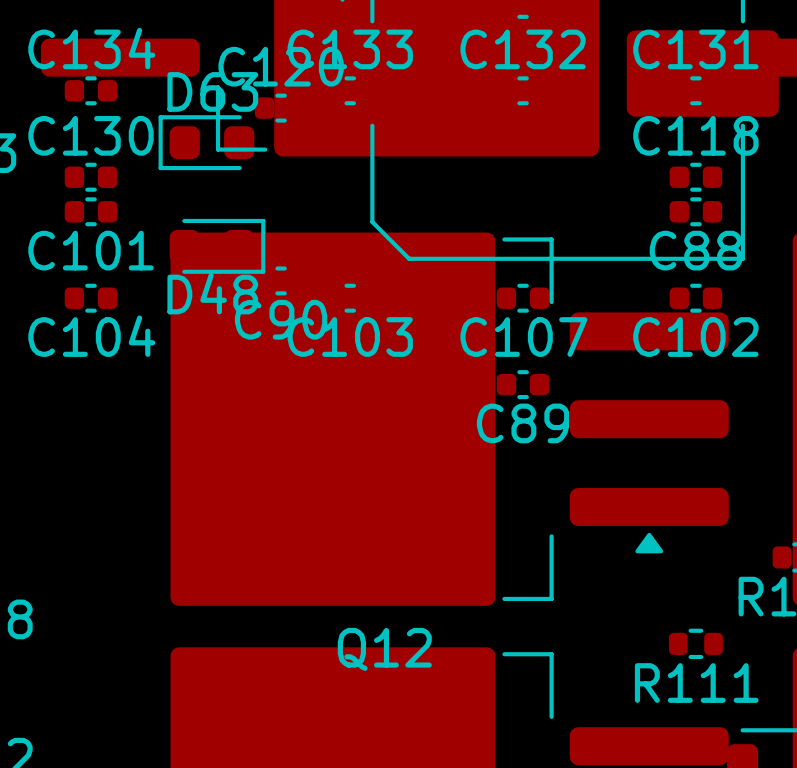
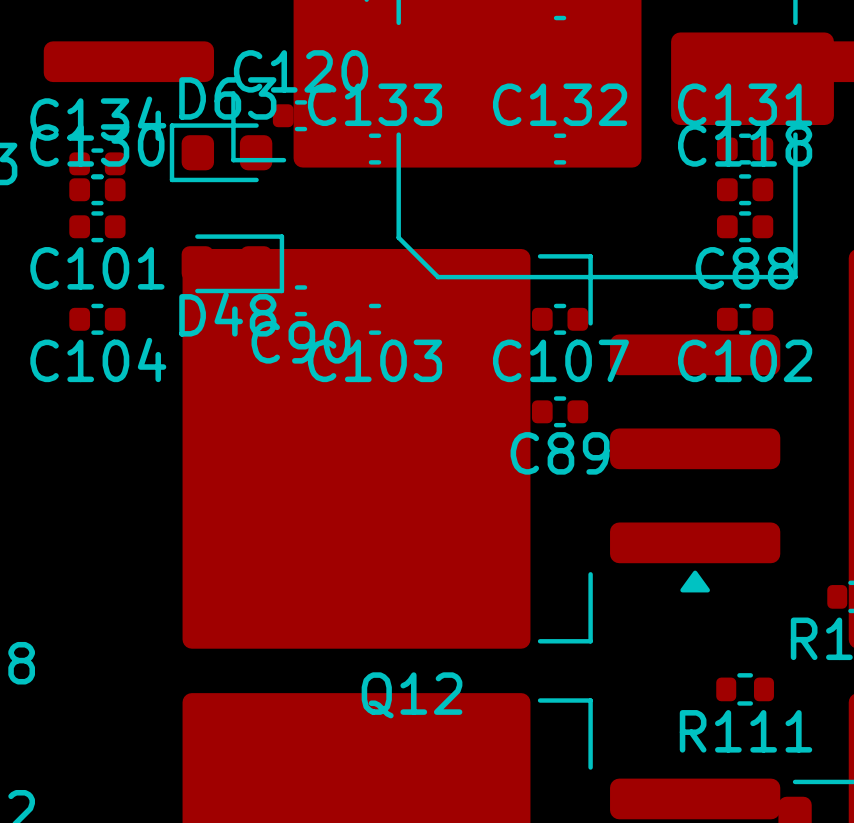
C134 position: (90, 90) -> (97, 163)
C133 position: (350, 90) -> (375, 149)
C132 position: (523, 90) -> (560, 149)
C131 position: (695, 90) -> (745, 149)

